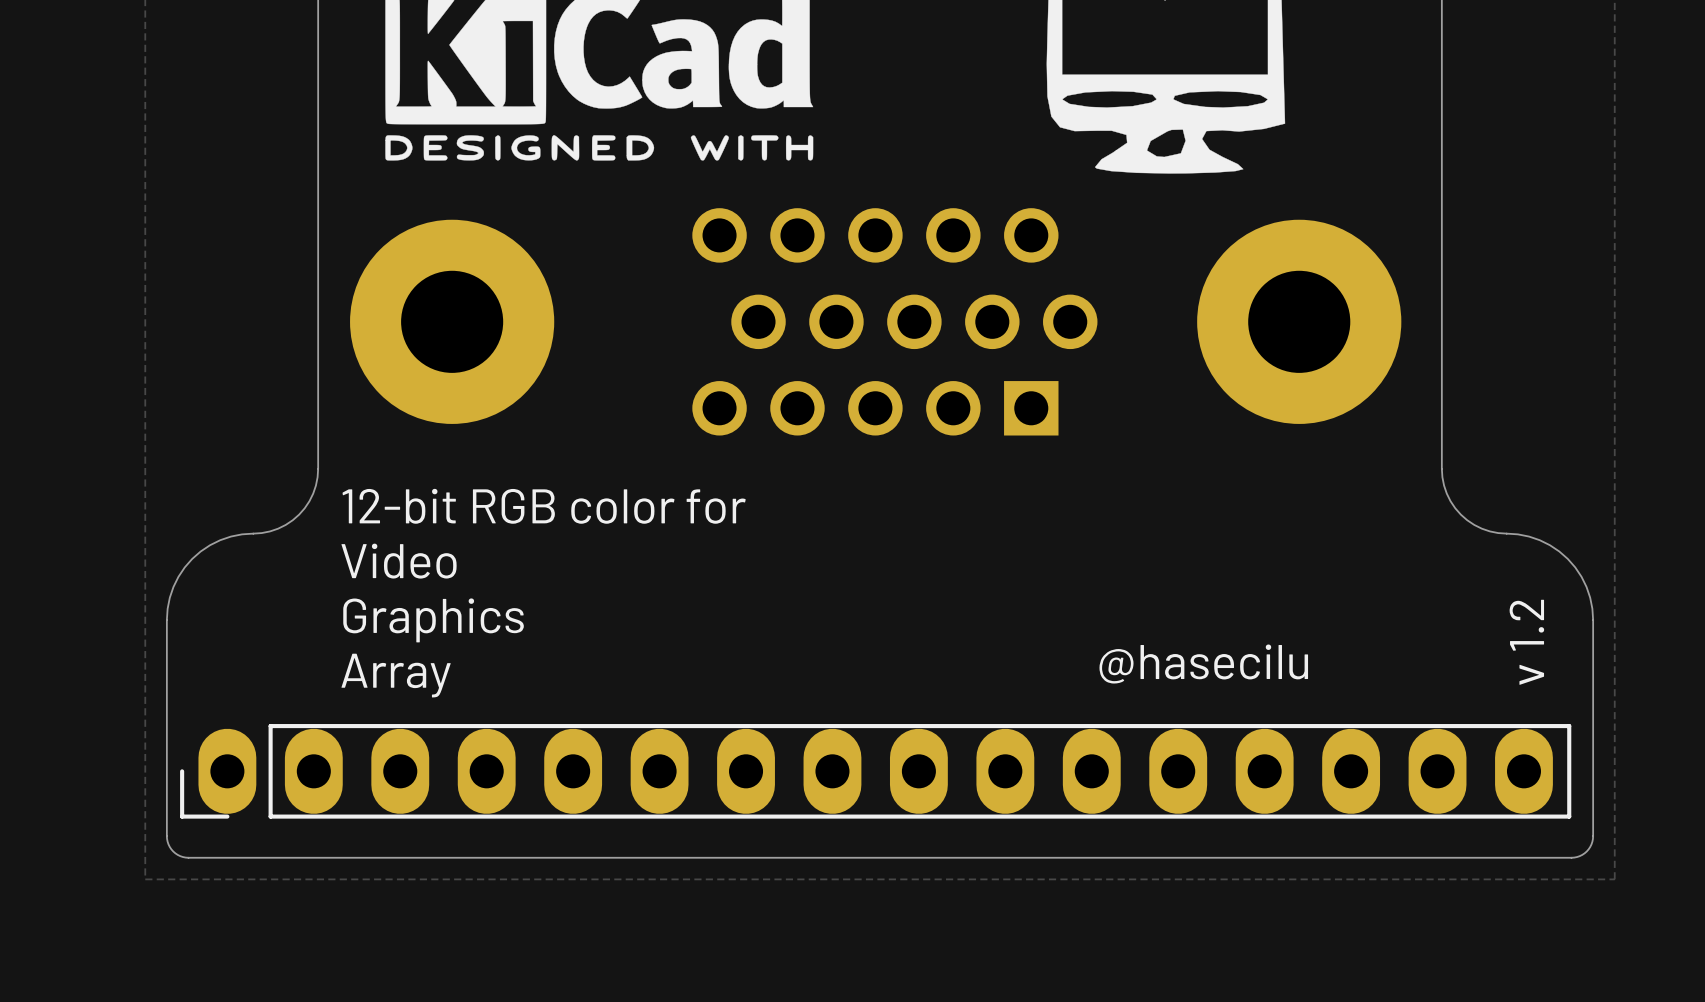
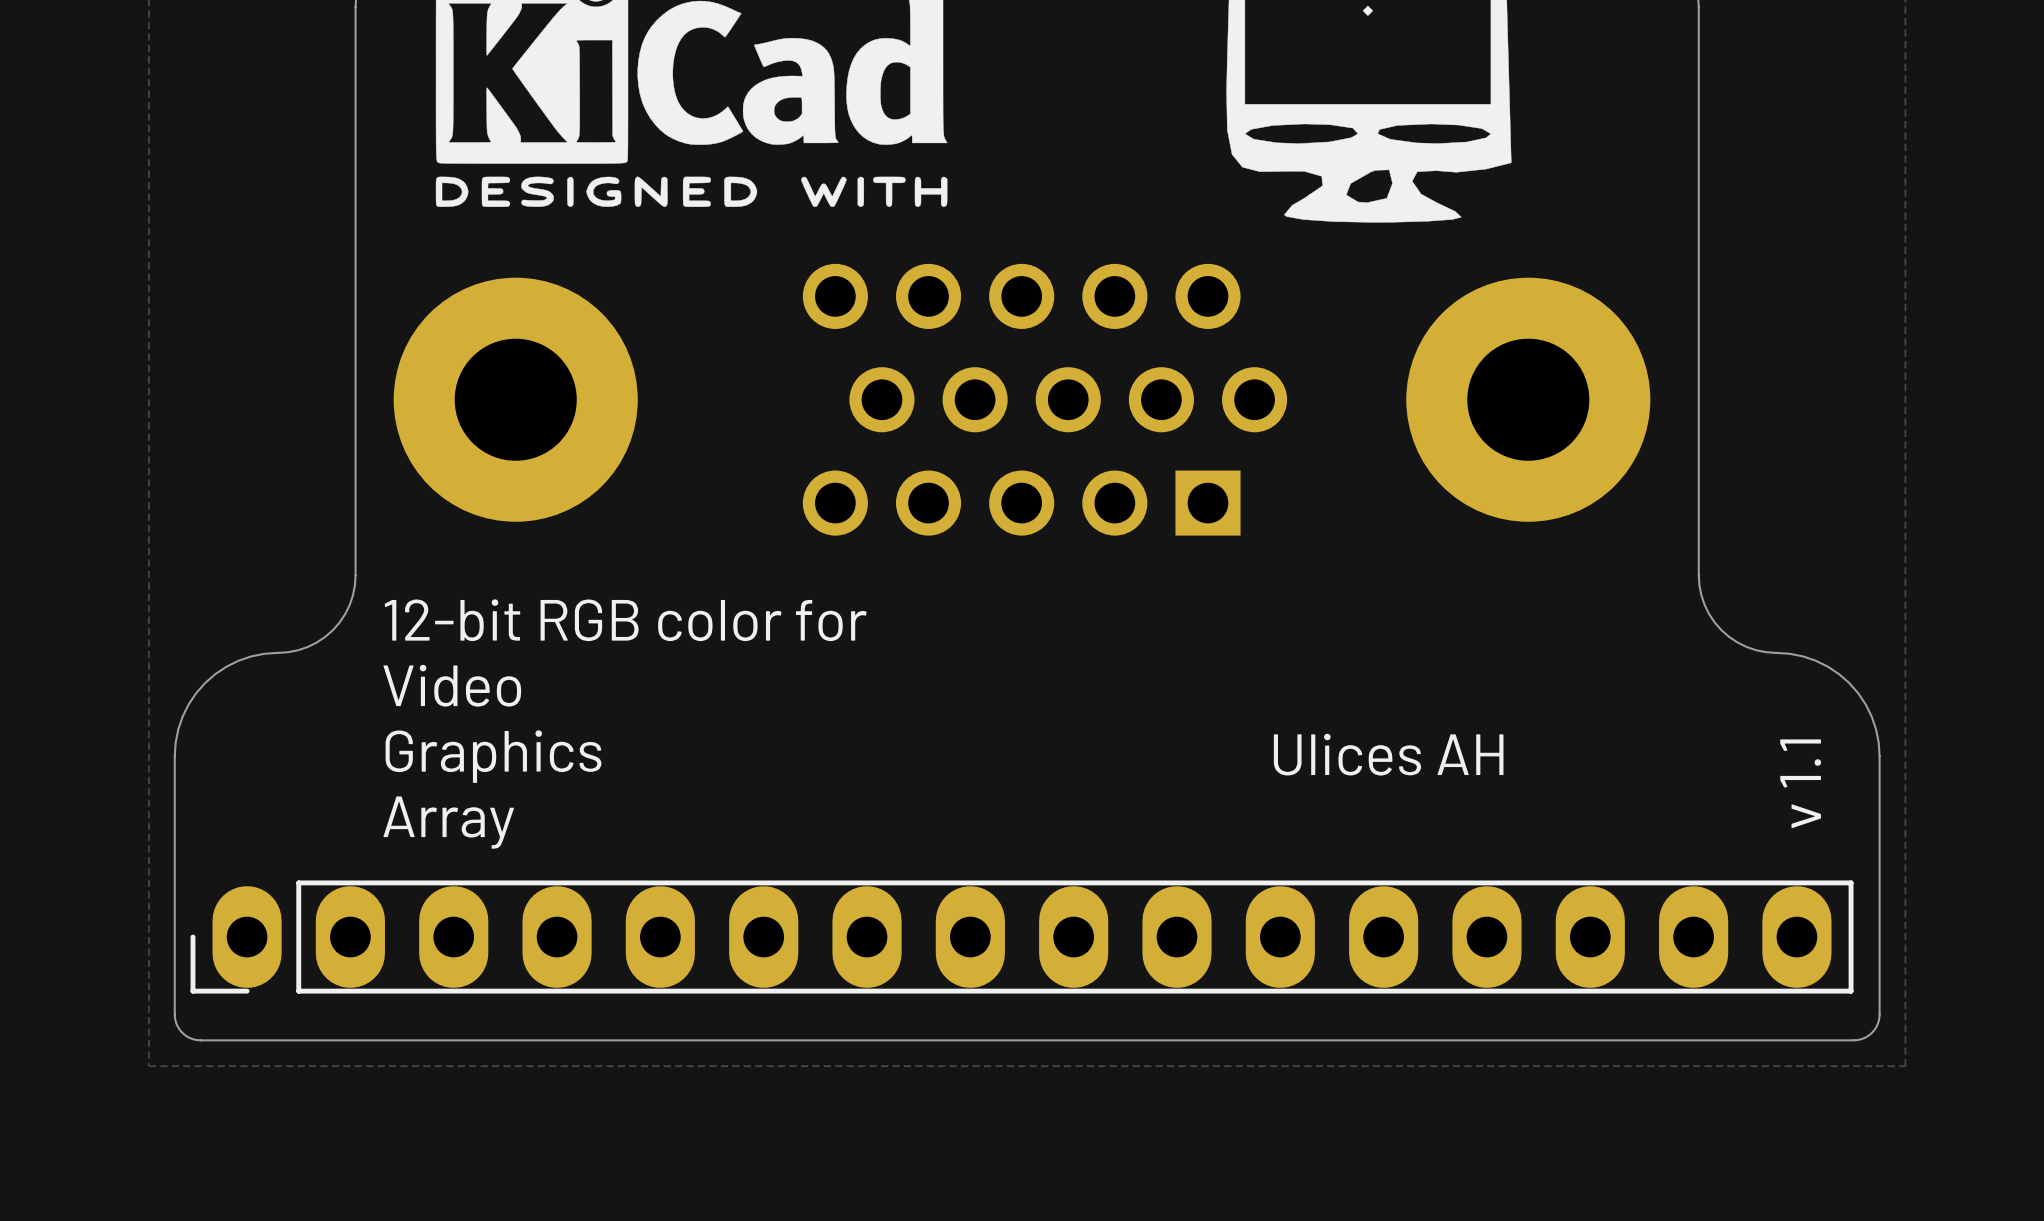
text: none -> Ulices AH (1388, 754)
text: v 1.2 (1526, 642) -> v 1.1 (1800, 783)
text: @hasecilu (1203, 664) -> none

